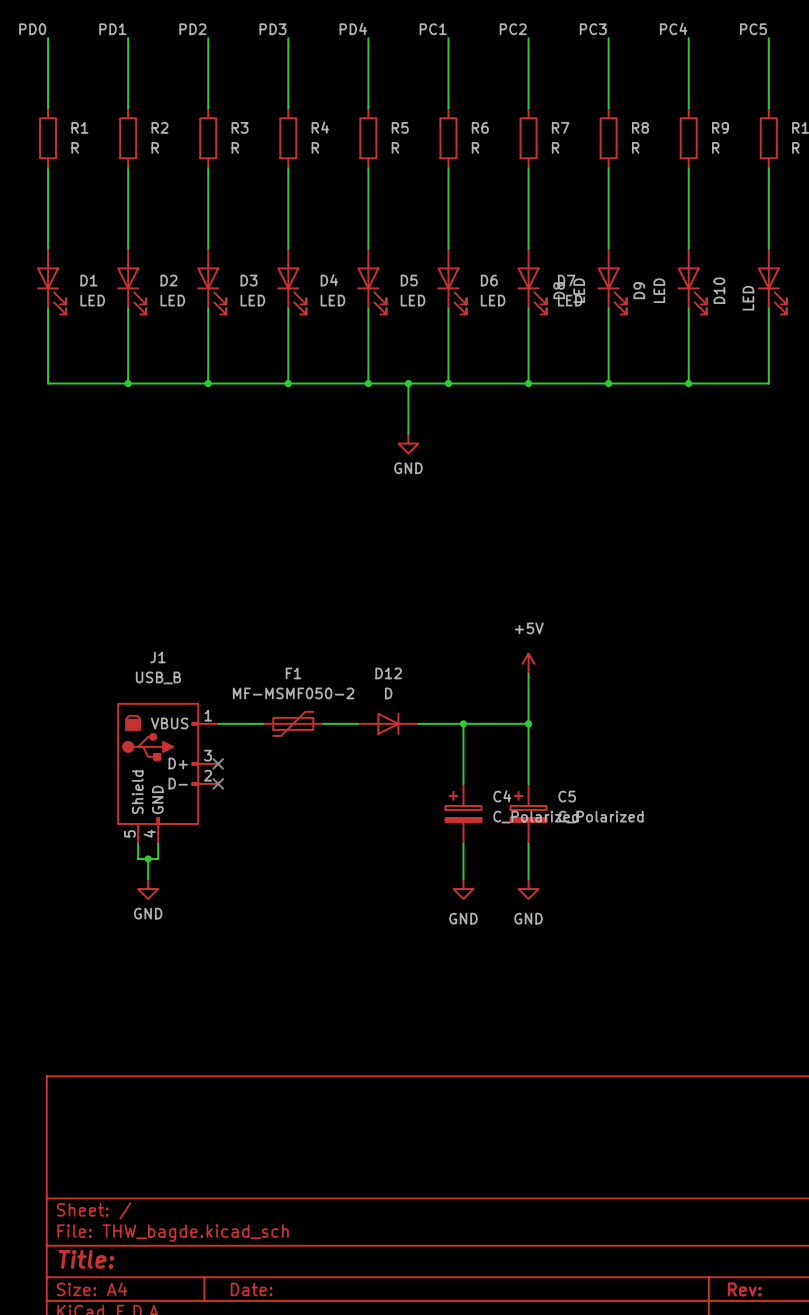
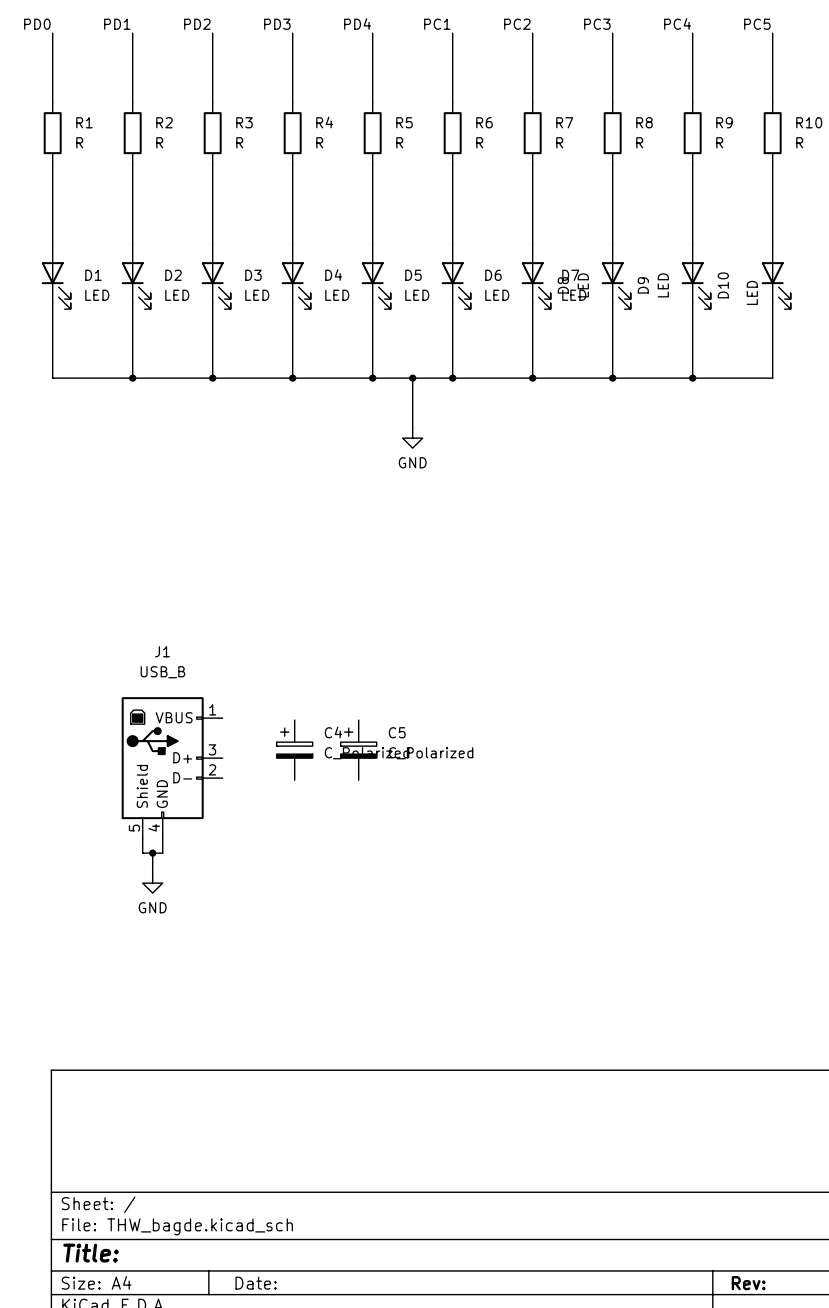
power symbol: +5V (528, 663) -> none
wire: (528, 673) (528, 783) -> none
wire: (218, 723) (263, 723) -> none
F1: MF-MSMF050-2 (293, 723) -> none
wire: (323, 723) (358, 723) -> none
D12: D (388, 723) -> none
wire: (418, 723) (528, 723) -> none
wire: (463, 723) (463, 783) -> none
junction: (463, 723) -> none
junction: (528, 723) -> none
no-connect mark: (218, 763) -> none
no-connect mark: (218, 783) -> none
C4 position: (463, 813) -> (294, 750)
C5 position: (528, 813) -> (358, 750)
wire: (463, 843) (463, 879) -> none
wire: (528, 843) (528, 879) -> none
power symbol: GND (463, 889) -> none
power symbol: GND (528, 889) -> none

